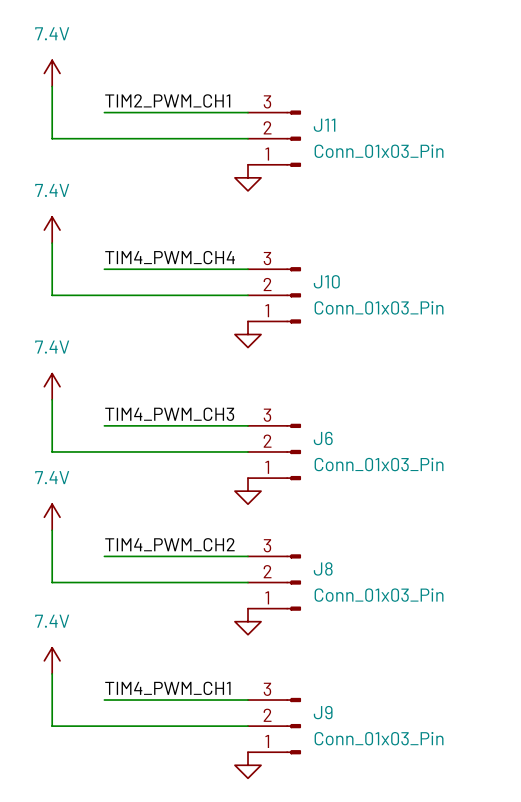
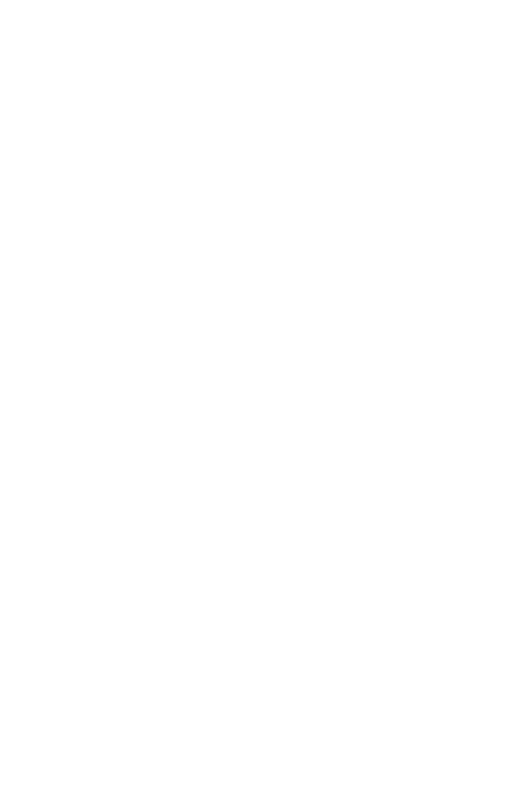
power symbol: 7.4V (52, 73) -> none
wire: (52, 86) (52, 138) (248, 138) -> none
label: TIM2_PWM_CH1 (167, 100) -> none
wire: (104, 112) (248, 112) -> none
J11: Conn_01x03_Pin (274, 138) -> none
power symbol: (248, 177) -> none
power symbol: 7.4V (52, 230) -> none
wire: (52, 243) (52, 295) (248, 295) -> none
label: TIM4_PWM_CH4 (170, 257) -> none
wire: (104, 269) (248, 269) -> none
J10: Conn_01x03_Pin (274, 295) -> none
power symbol: (248, 334) -> none
power symbol: 7.4V (52, 386) -> none
wire: (52, 399) (52, 451) (248, 451) -> none
label: TIM4_PWM_CH3 (169, 414) -> none
wire: (104, 425) (248, 425) -> none
J6: Conn_01x03_Pin (274, 451) -> none
power symbol: (248, 491) -> none
power symbol: 7.4V (52, 517) -> none
wire: (52, 530) (52, 582) (248, 582) -> none
label: TIM4_PWM_CH2 (169, 544) -> none
wire: (104, 556) (248, 556) -> none
J8: Conn_01x03_Pin (274, 582) -> none
power symbol: (248, 621) -> none
power symbol: 7.4V (52, 660) -> none
wire: (52, 673) (52, 726) (248, 726) -> none
label: TIM4_PWM_CH1 (167, 688) -> none
wire: (104, 700) (248, 700) -> none
J9: Conn_01x03_Pin (274, 726) -> none
power symbol: (248, 765) -> none

